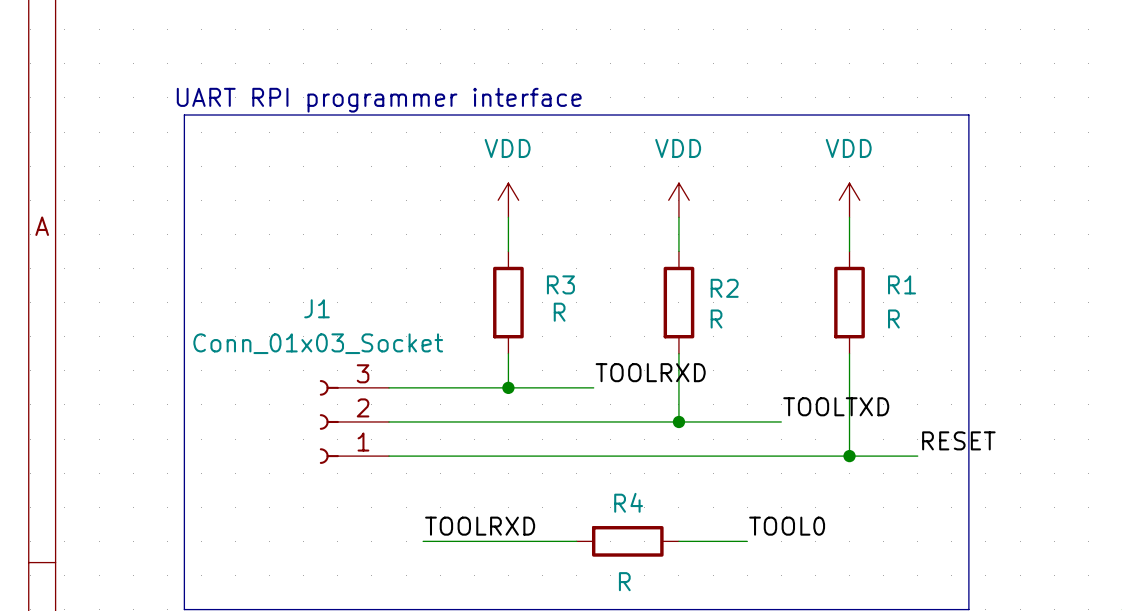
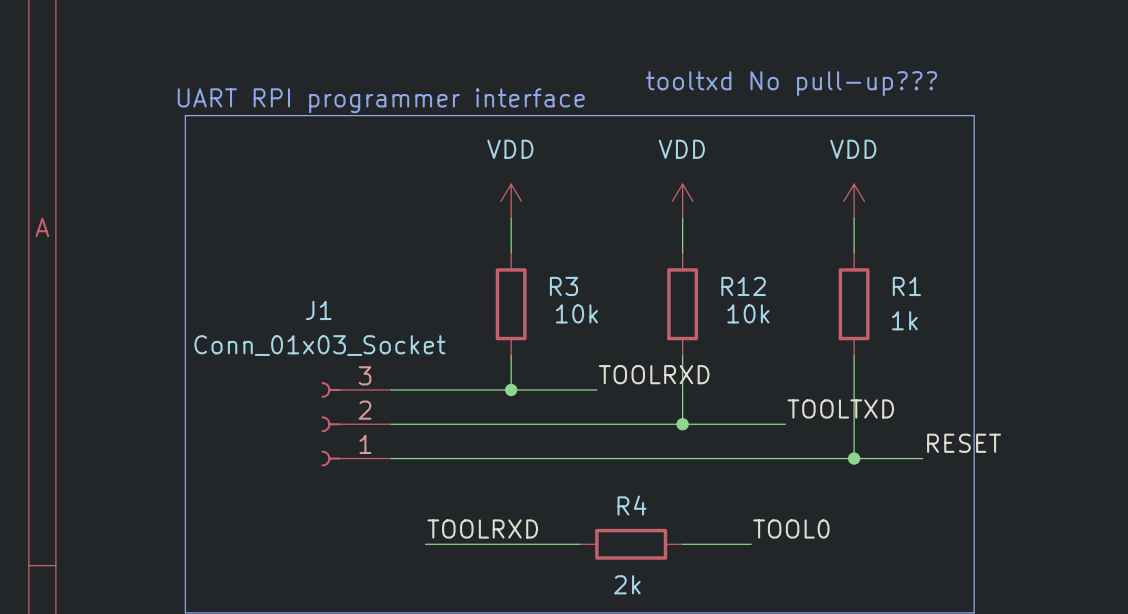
text: none -> tooltxd No pull-up??? (791, 83)
R2 name: R2 (724, 288) -> R12 (743, 286)
R3 value: R (559, 312) -> 10k (576, 313)
R2 value: R (716, 319) -> 10k (748, 313)
R1 value: R (893, 319) -> 1k (904, 320)
R4 value: R (624, 581) -> 2k (627, 584)

